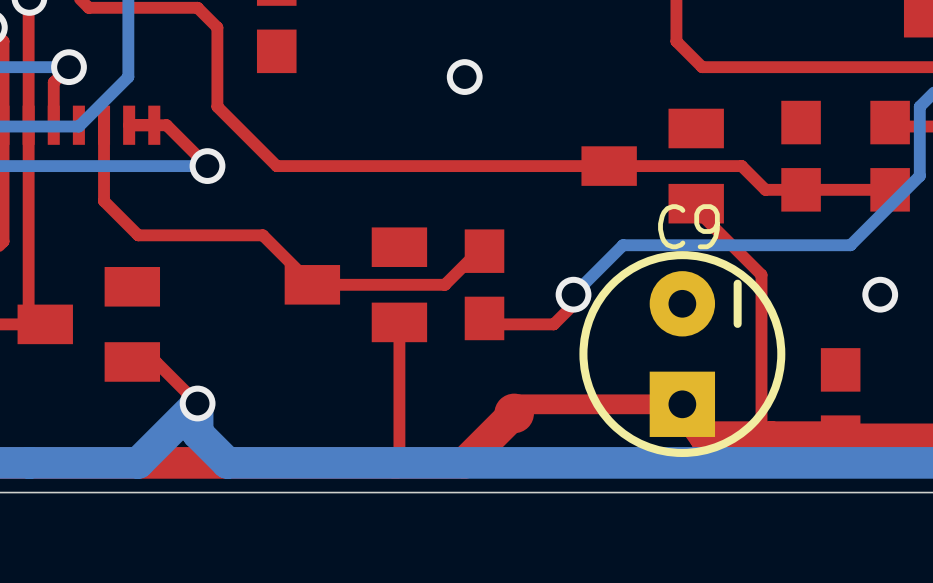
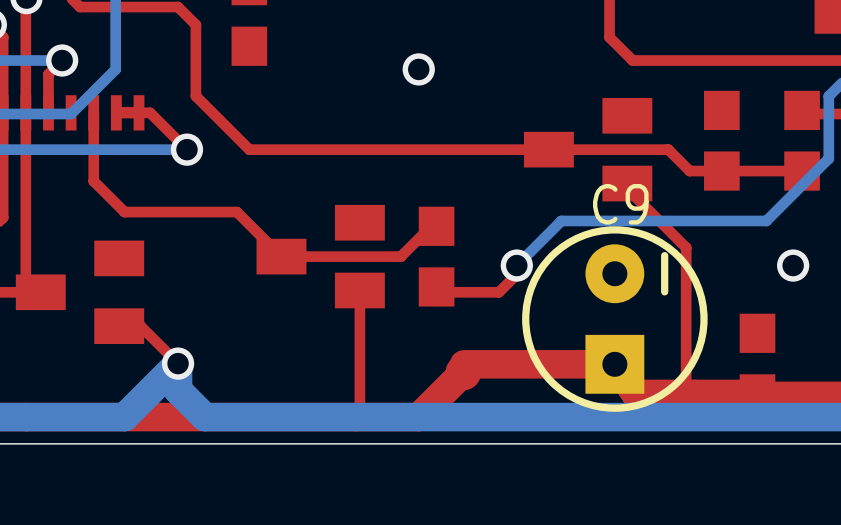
top track width: thin (682, 404) (514, 404) -> thick (614, 364) (464, 364)

